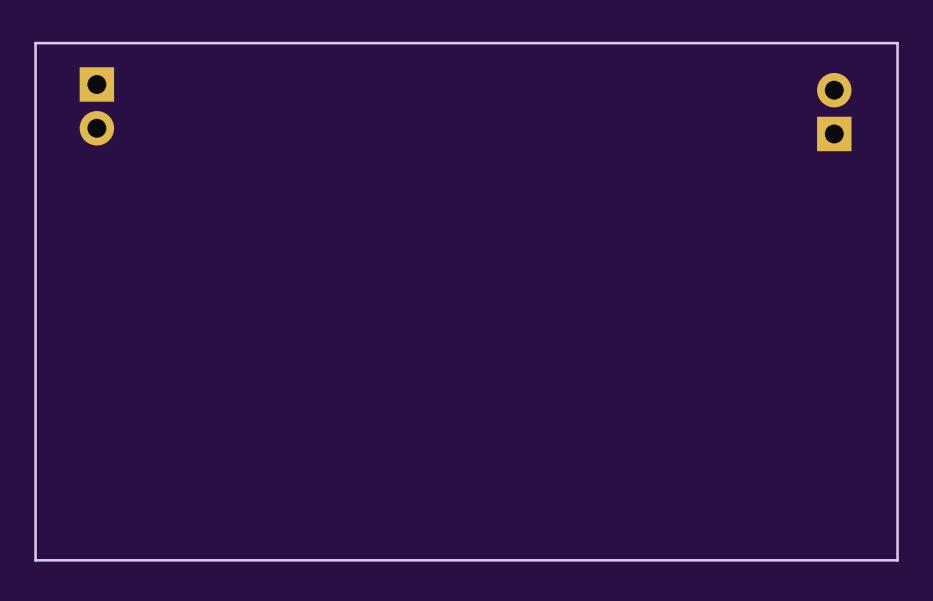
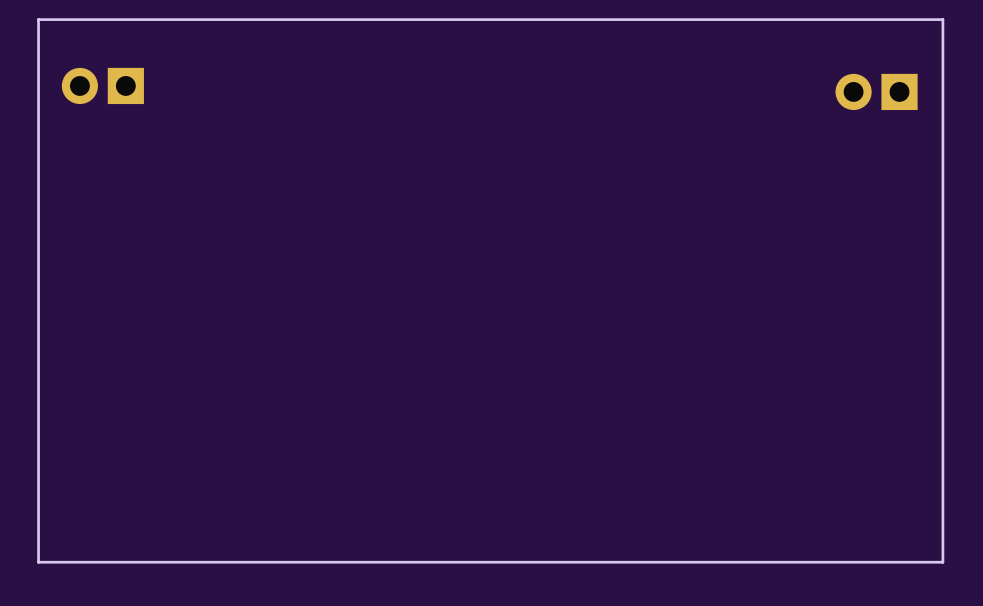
part rotation: 0° (96, 106) -> 90° clockwise (102, 85)
part rotation: 0° (834, 112) -> 90° counterclockwise (876, 91)

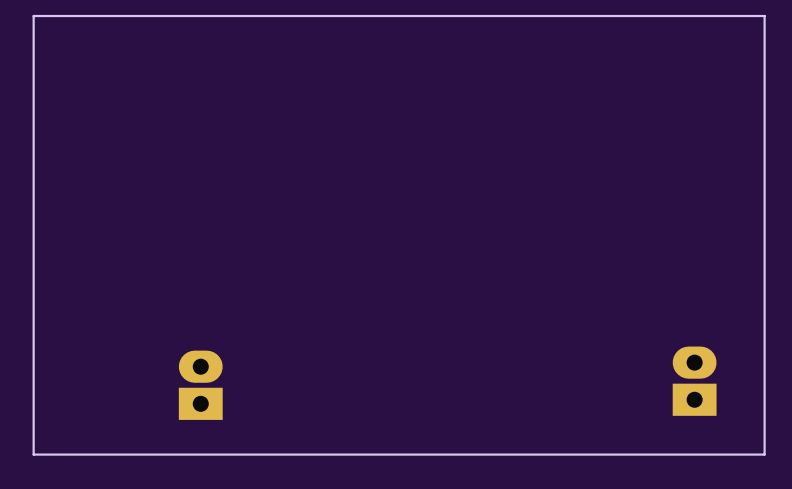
part: (102, 85) -> none
part: (876, 91) -> none
part: none -> (694, 381)
part: none -> (200, 385)

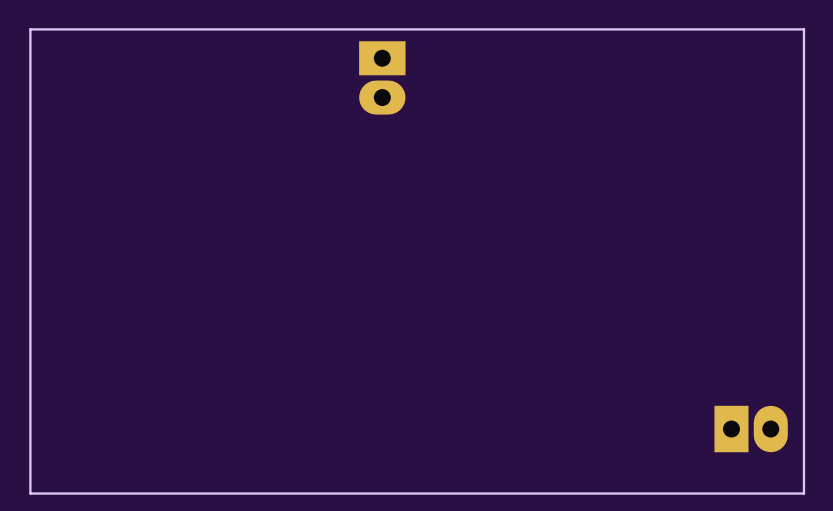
part: none -> (382, 77)
part rotation: 0° (694, 381) -> 90° clockwise (751, 429)
part: (200, 385) -> none

